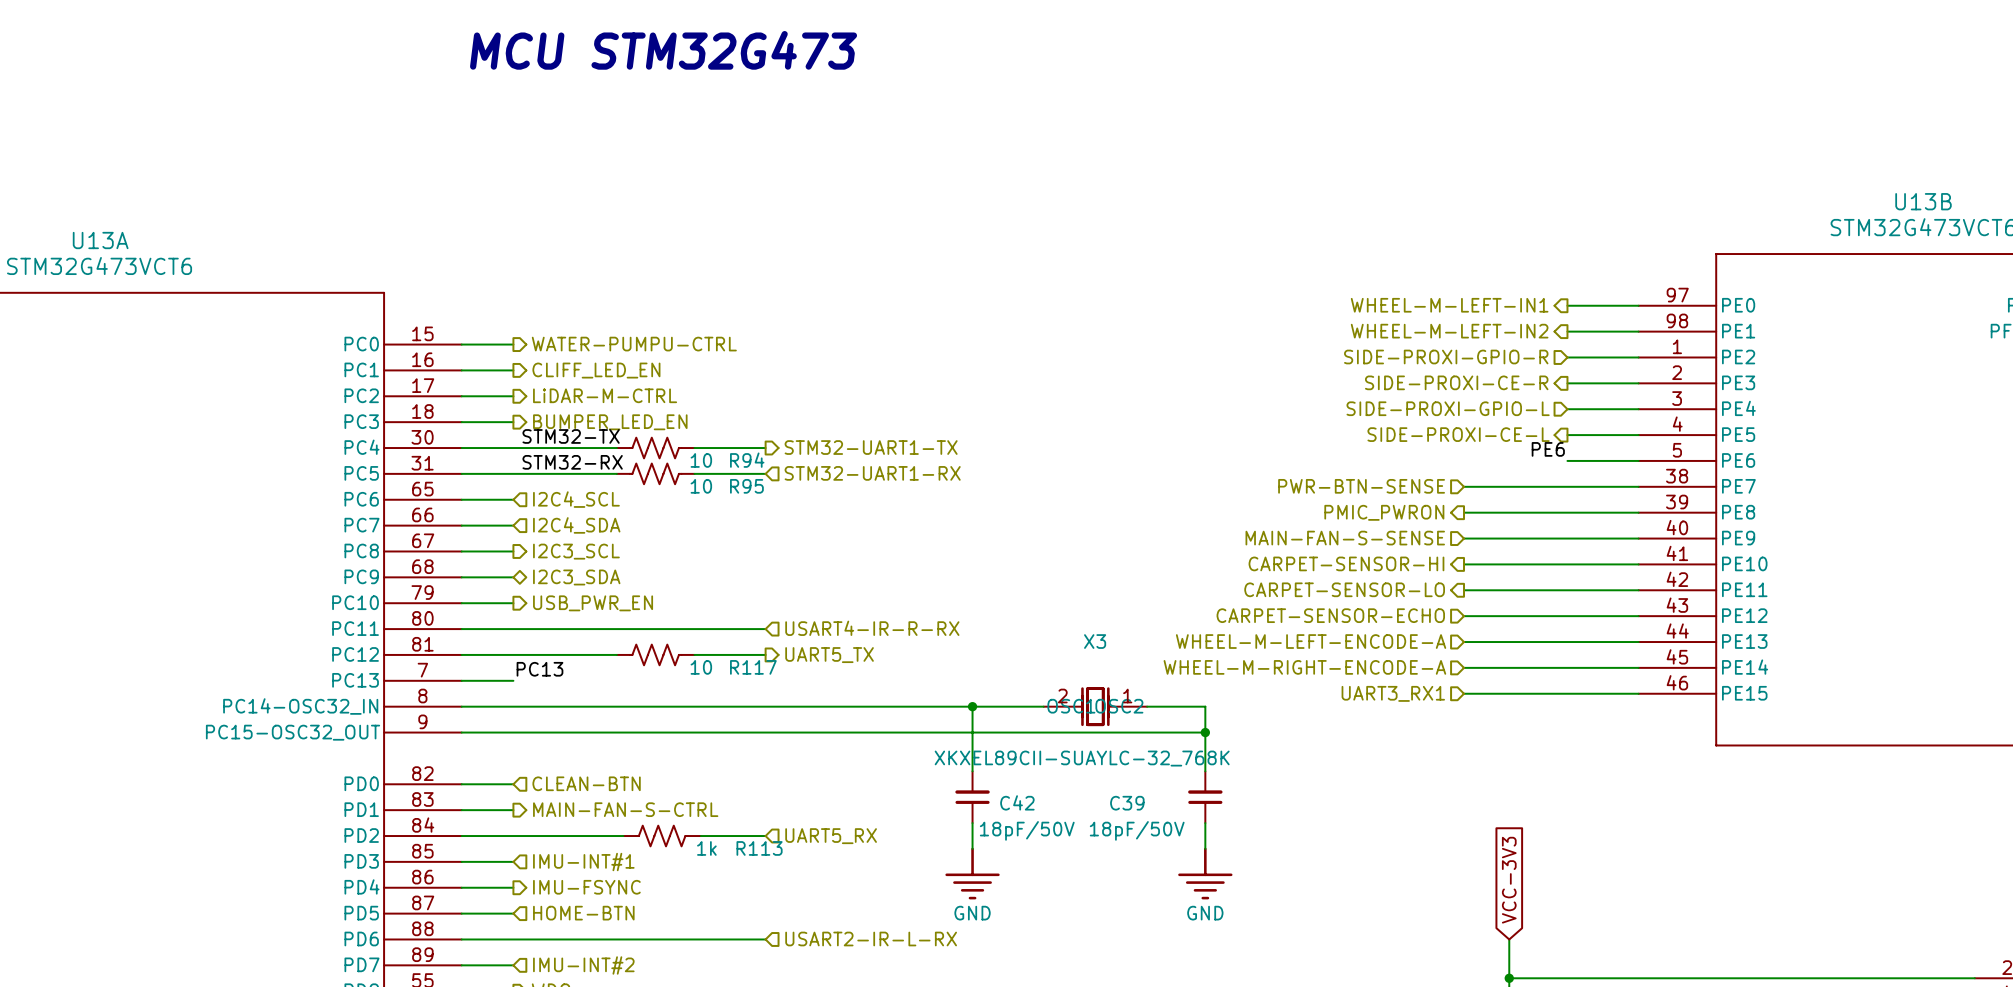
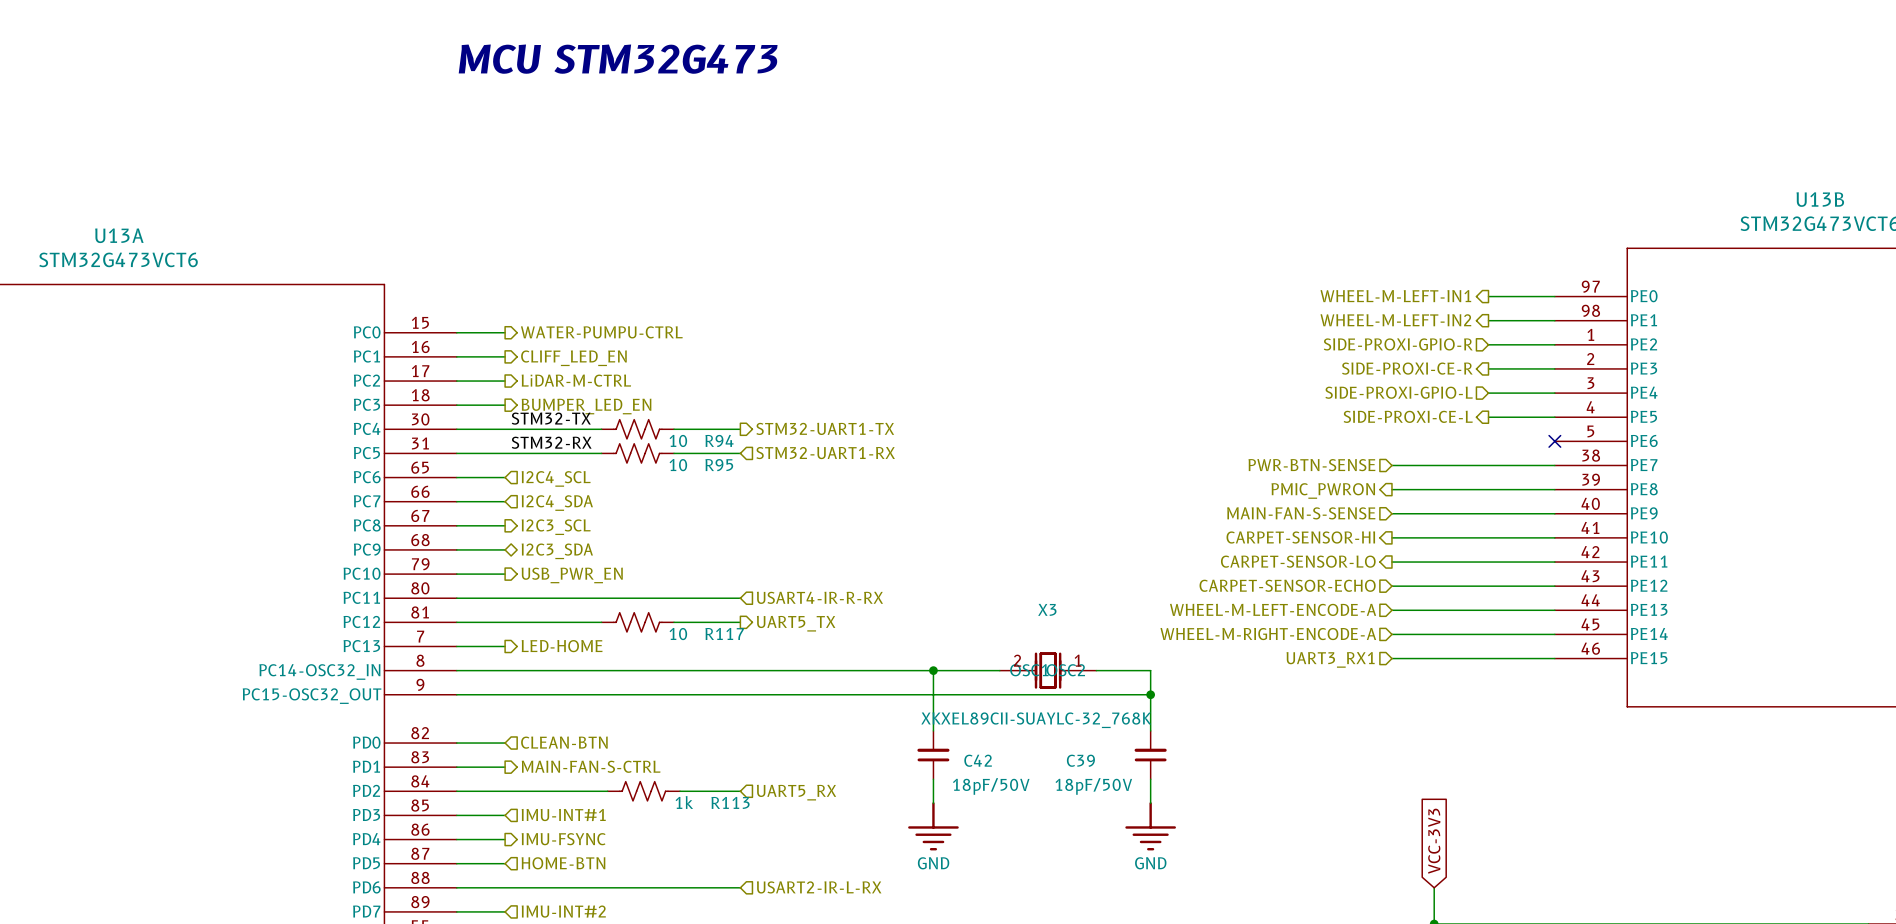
label: PE6 (1548, 449) -> none
wire: (1567, 460) (1638, 460) -> none
no-connect mark: none -> (1554, 441)
label: PC13 (539, 669) -> none
hierarchical label: none -> LED-HOME (562, 646)

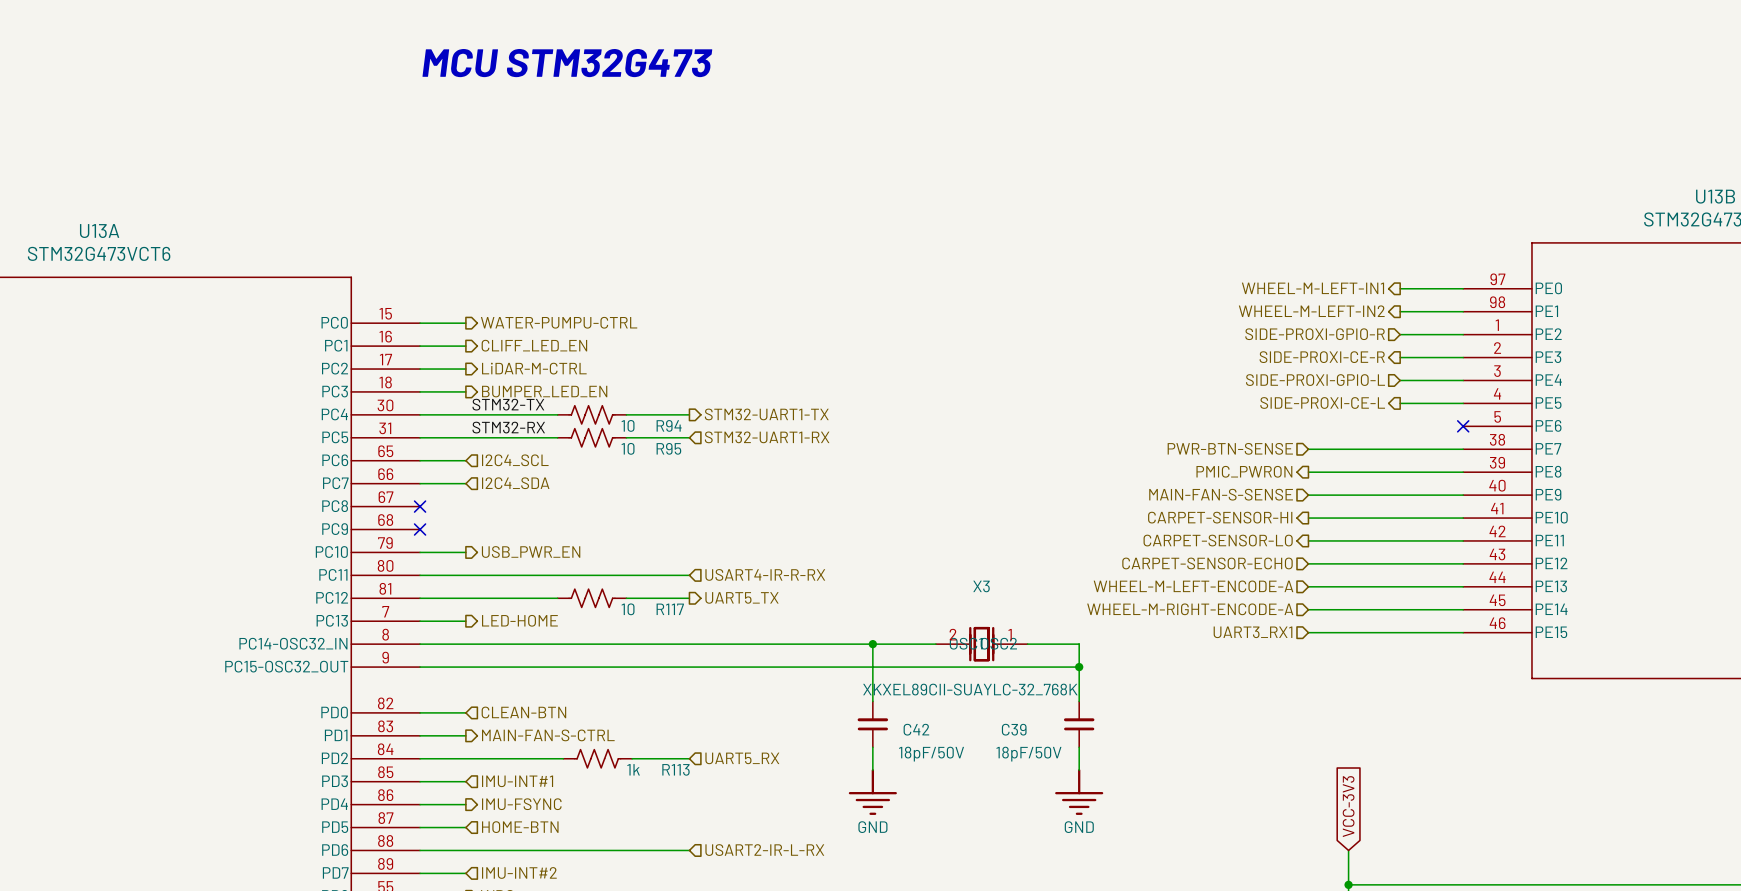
wire: (456, 525) (505, 525) -> none
no-connect mark: none -> (420, 506)
hierarchical label: I2C3_SCL (556, 527) -> none
wire: (456, 549) (505, 549) -> none
no-connect mark: none -> (420, 529)
hierarchical label: I2C3_SDA (557, 551) -> none

